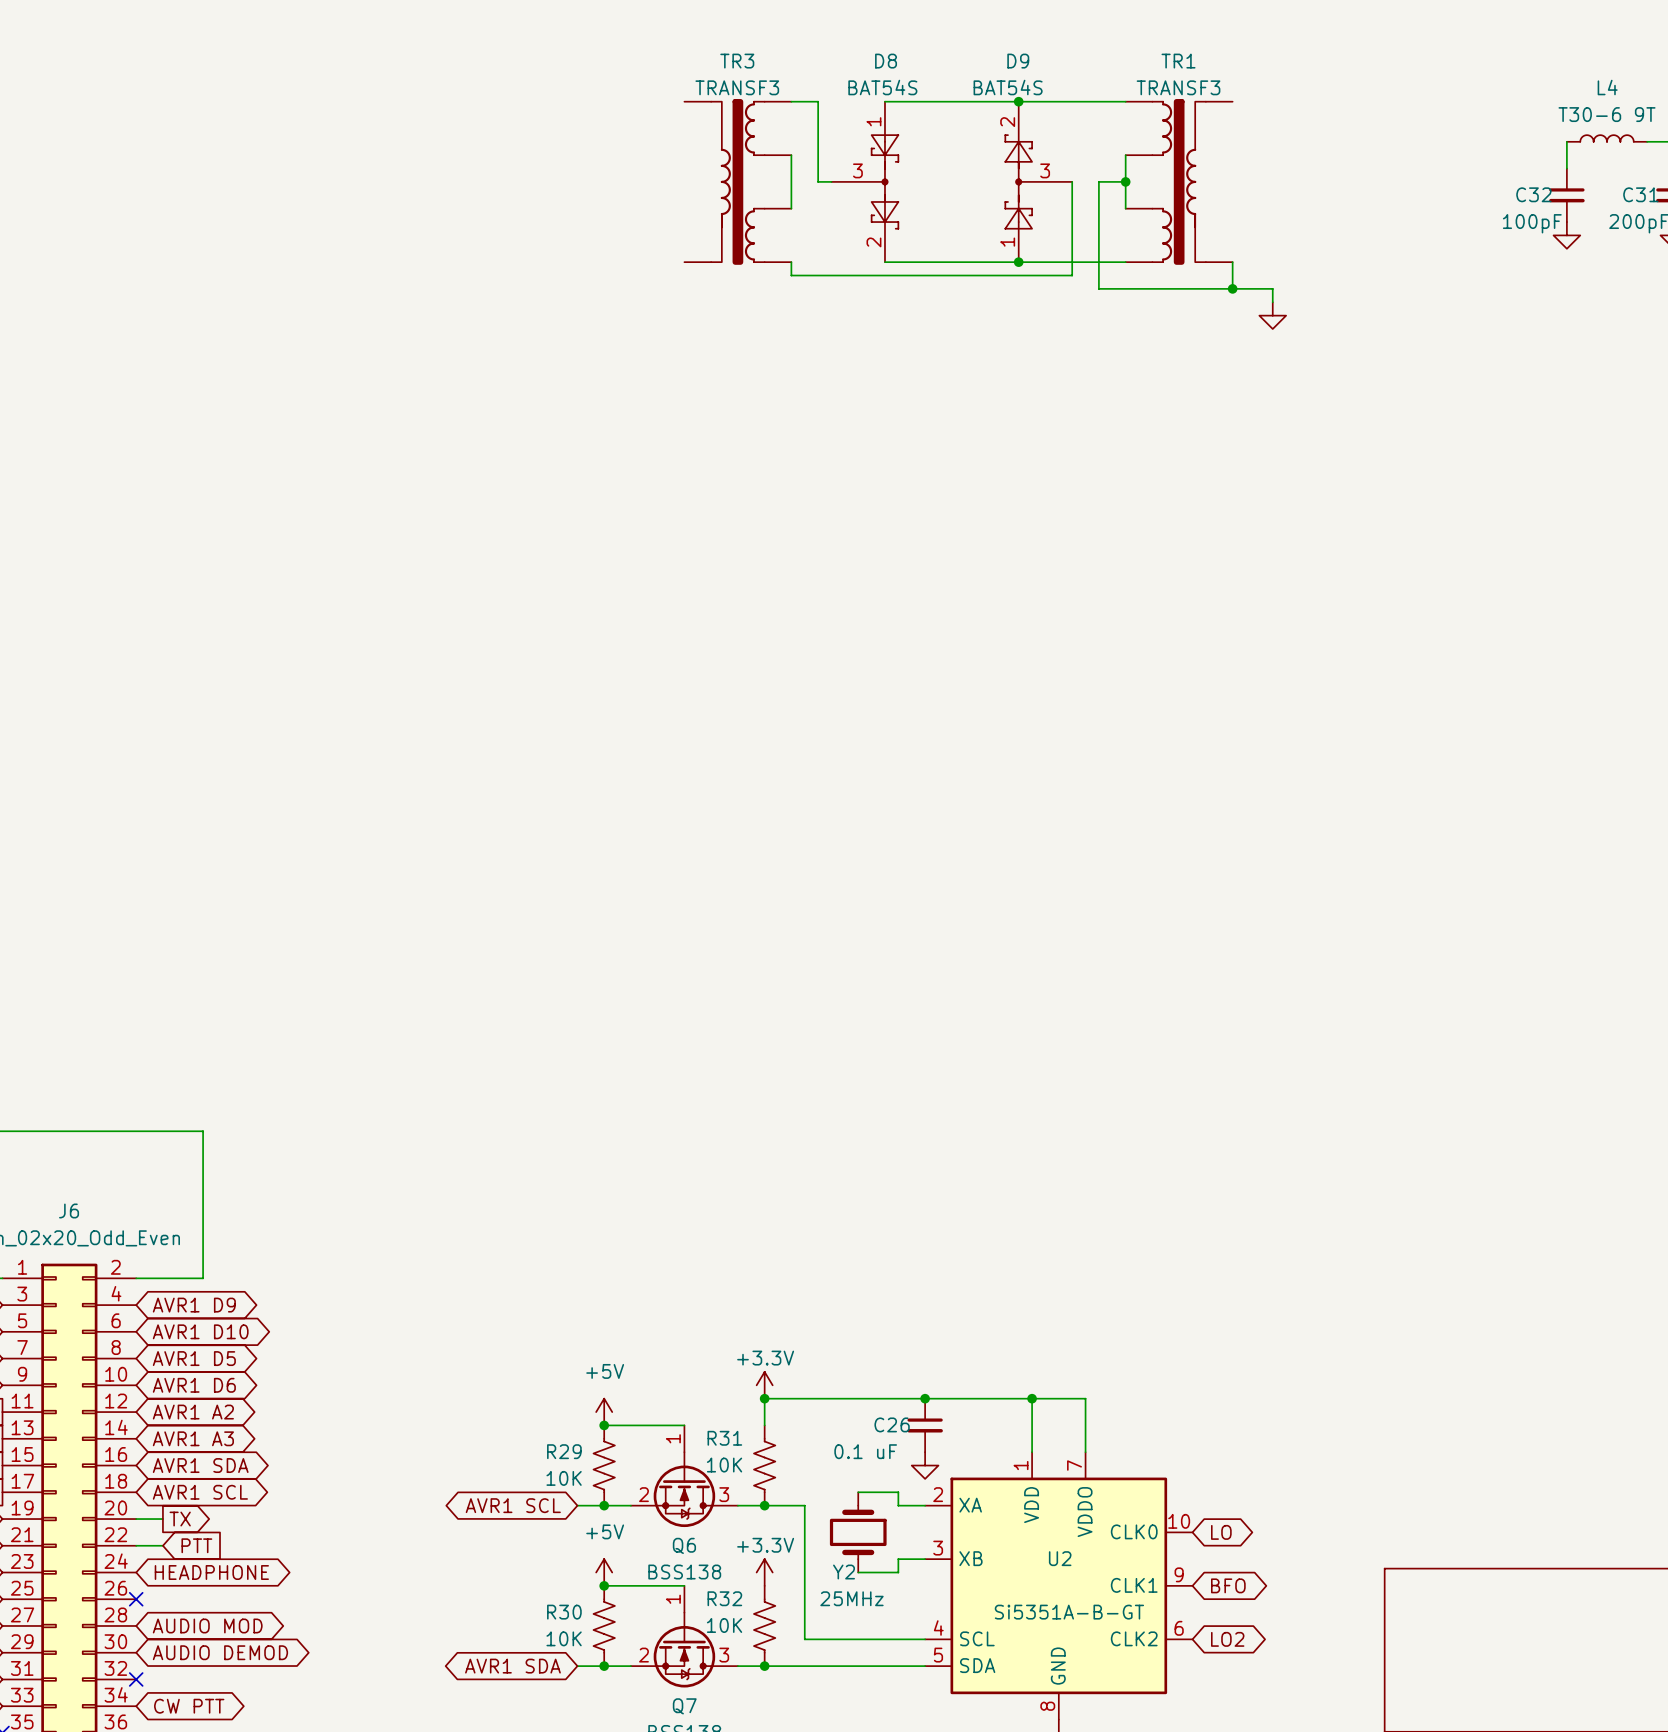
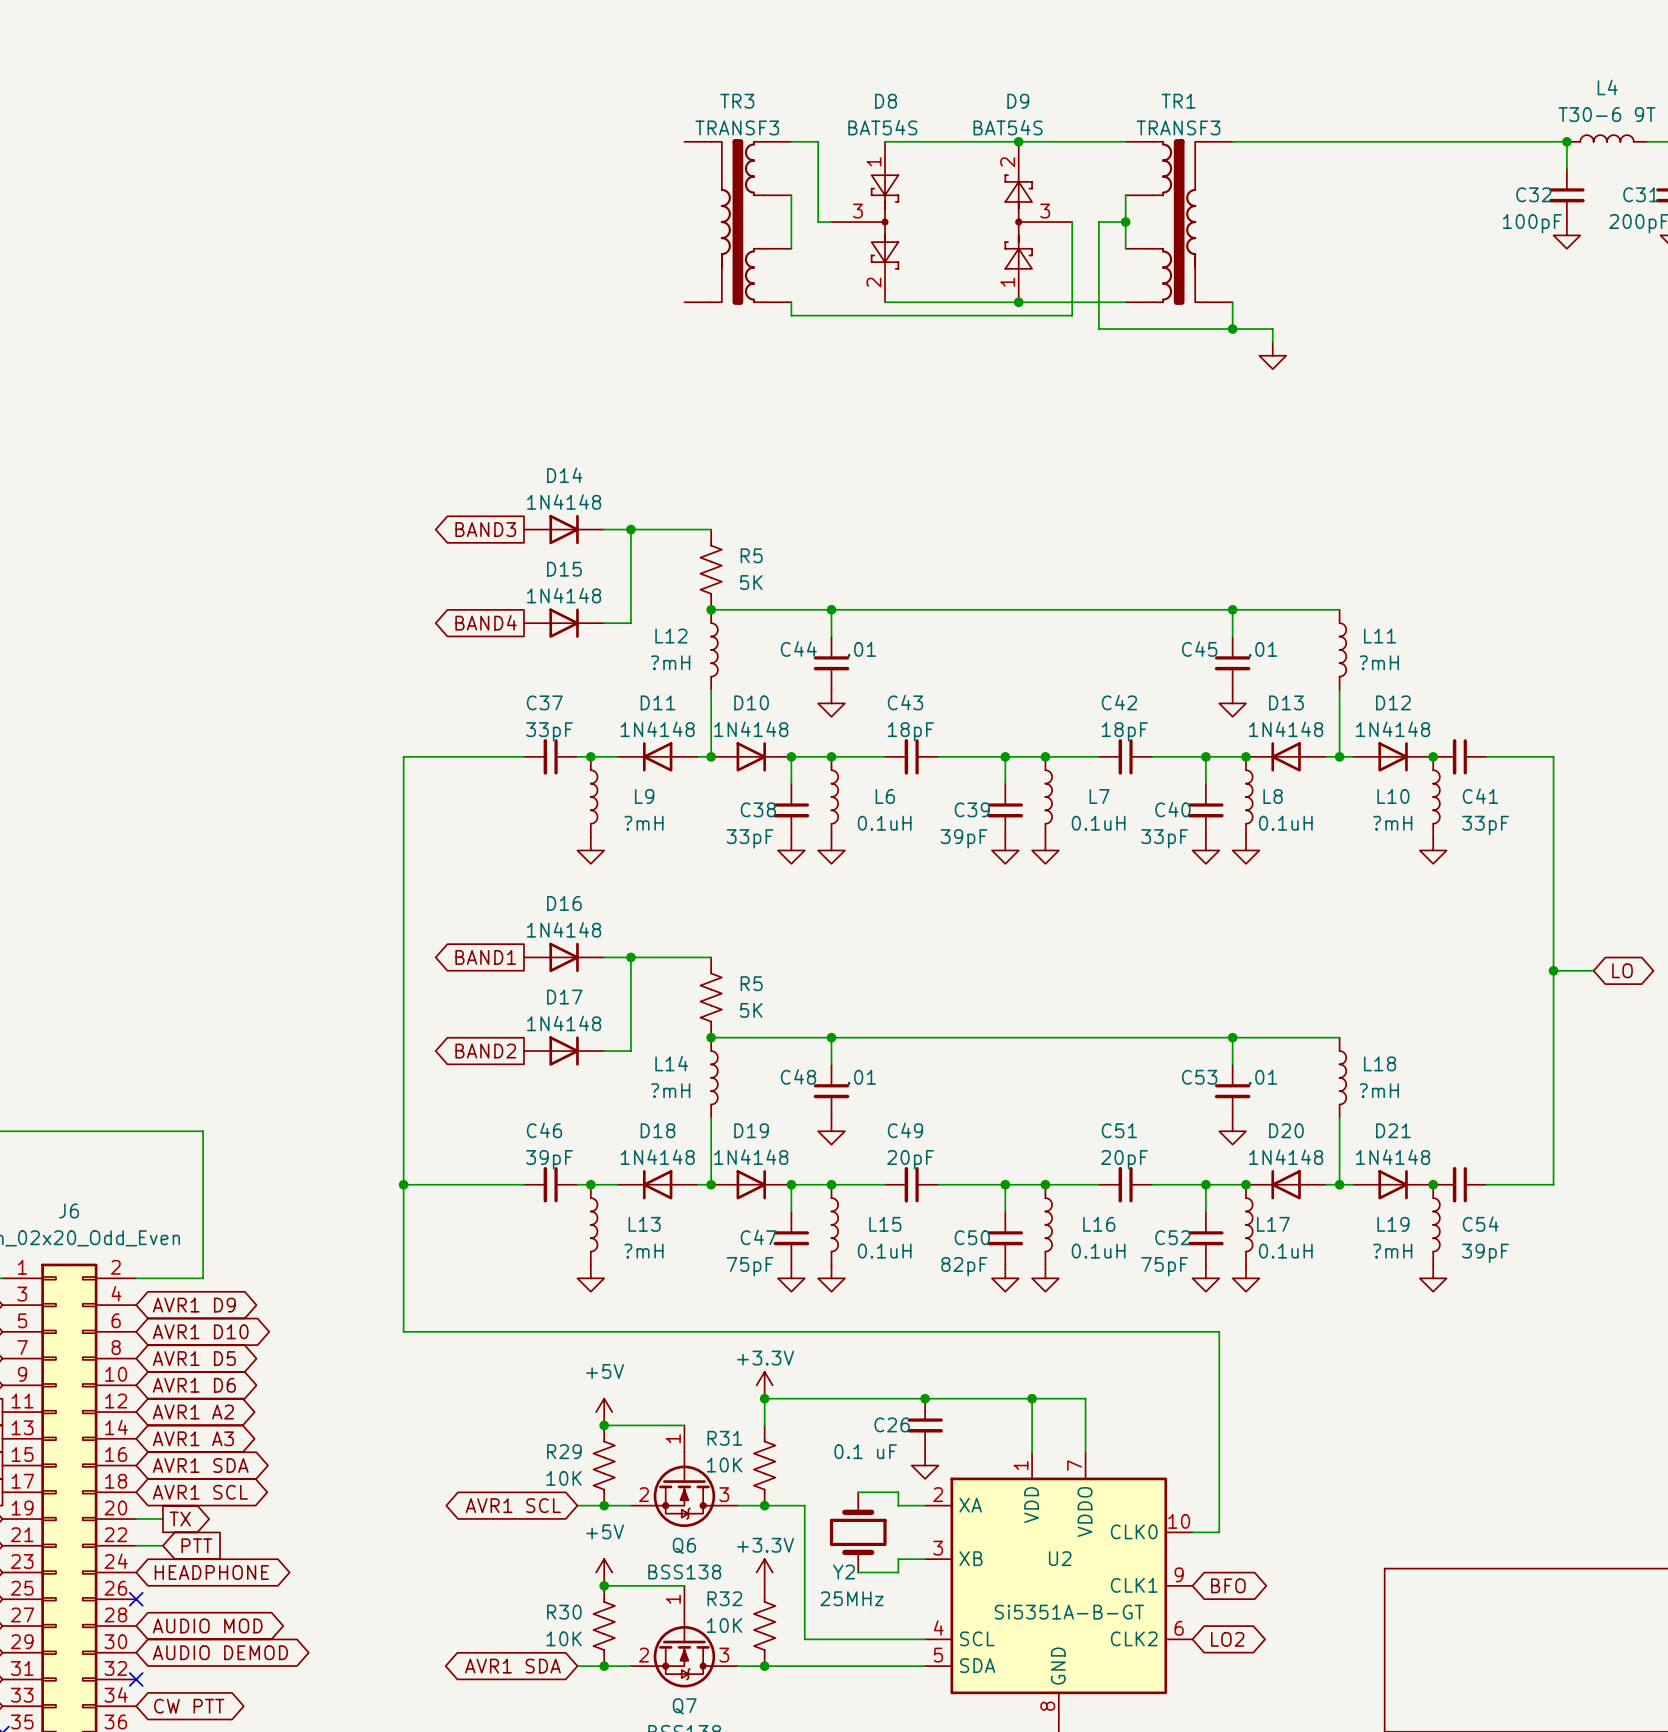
wire: (791, 101) (818, 101) (818, 141) -> (791, 141) (818, 141)
wire: (884, 101) (1125, 101) -> (884, 141) (1125, 141)
junction position: (1018, 101) -> (1018, 141)
wire: none -> (1232, 141) (1566, 141)
junction: none -> (1566, 141)
wire: (791, 155) (791, 195) -> (791, 208) (791, 248)
wire: (1125, 155) (1125, 195) -> (1125, 208) (1125, 248)
TR3 position: (737, 181) -> (737, 222)
wire: (818, 181) (831, 181) -> (818, 181) (818, 222) (831, 222)
D8 position: (864, 181) -> (864, 222)
D9 position: (1038, 181) -> (1038, 222)
wire: (1072, 181) (1072, 222) -> none
wire: (1125, 181) (1098, 181) (1098, 222) -> (1125, 222) (1098, 222)
junction position: (1125, 181) -> (1125, 222)
TR1 position: (1179, 181) -> (1179, 222)
wire: (791, 262) (791, 275) (1072, 275) -> (791, 302) (791, 315) (1072, 315) (1072, 275)
wire: (884, 262) (1125, 262) -> (884, 302) (1125, 302)
junction position: (1018, 262) -> (1018, 302)
wire: (1232, 262) (1232, 288) -> (1232, 302) (1232, 329)
wire: (1098, 288) (1272, 288) (1272, 302) -> (1098, 288) (1098, 329) (1272, 329) (1272, 342)
junction position: (1232, 288) -> (1232, 329)
power symbol position: (1272, 315) -> (1272, 355)
global label: none -> BAND3 (485, 529)
D14: none -> 1N4148 (564, 529)
wire: none -> (604, 529) (711, 529)
wire: none -> (630, 529) (630, 623) (604, 623)
junction: none -> (630, 529)
R5: none -> 5K (711, 569)
wire: none -> (711, 609) (1339, 609)
junction: none -> (711, 609)
wire: none -> (831, 609) (831, 636)
junction: none -> (831, 609)
wire: none -> (1232, 609) (1232, 636)
junction: none -> (1232, 609)
global label: none -> BAND4 (486, 622)
D15: none -> 1N4148 (564, 623)
L12: none -> ?mH (714, 649)
L11: none -> ?mH (1342, 649)
C44: none -> .01 (831, 663)
C45: none -> .01 (1232, 663)
wire: none -> (711, 690) (711, 756) (697, 756)
wire: none -> (1339, 690) (1339, 756)
power symbol: none -> (831, 703)
power symbol: none -> (1232, 703)
wire: none -> (523, 756) (403, 756) (403, 1331) (1219, 1331) (1219, 1532) (1192, 1532)
C37: none -> 33pF (550, 756)
wire: none -> (577, 756) (617, 756)
junction: none -> (590, 756)
D11: none -> 1N4148 (657, 756)
junction: none -> (711, 756)
D10: none -> 1N4148 (751, 756)
junction: none -> (791, 756)
junction: none -> (831, 756)
wire: none -> (884, 756) (791, 756) (791, 783)
C43: none -> 18pF (911, 756)
wire: none -> (938, 756) (1098, 756)
wire: none -> (1005, 756) (1005, 783)
junction: none -> (1005, 756)
junction: none -> (1045, 756)
C42: none -> 18pF (1125, 756)
wire: none -> (1152, 756) (1246, 756)
wire: none -> (1205, 756) (1205, 783)
junction: none -> (1205, 756)
junction: none -> (1246, 756)
D13: none -> 1N4148 (1286, 756)
wire: none -> (1326, 756) (1352, 756)
junction: none -> (1339, 756)
D12: none -> 1N4148 (1393, 756)
junction: none -> (1433, 756)
C41: none -> 33pF (1459, 756)
wire: none -> (1486, 756) (1553, 756) (1553, 1184) (1486, 1184)
L9: none -> ?mH (594, 796)
L6: none -> 0.1uH (834, 796)
L7: none -> 0.1uH (1048, 796)
L8: none -> 0.1uH (1249, 796)
L10: none -> ?mH (1436, 796)
C38: none -> 33pF (791, 810)
C39: none -> 39pF (1005, 810)
C40: none -> 33pF (1205, 810)
power symbol: none -> (590, 850)
power symbol: none -> (791, 850)
power symbol: none -> (831, 850)
power symbol: none -> (1005, 850)
power symbol: none -> (1045, 850)
power symbol: none -> (1205, 850)
power symbol: none -> (1246, 850)
power symbol: none -> (1433, 850)
global label: none -> BAND1 (485, 957)
D16: none -> 1N4148 (564, 957)
wire: none -> (604, 957) (711, 957)
wire: none -> (630, 957) (630, 1051) (604, 1051)
junction: none -> (630, 957)
wire: none -> (1553, 970) (1593, 970)
junction: none -> (1553, 970)
global label: none -> LO (1622, 970)
R5: none -> 5K (711, 997)
wire: none -> (711, 1037) (1339, 1037)
junction: none -> (711, 1037)
wire: none -> (831, 1037) (831, 1064)
junction: none -> (831, 1037)
wire: none -> (1232, 1037) (1232, 1064)
junction: none -> (1232, 1037)
global label: none -> BAND2 (485, 1051)
D17: none -> 1N4148 (564, 1051)
L14: none -> ?mH (714, 1077)
L18: none -> ?mH (1342, 1077)
C48: none -> .01 (831, 1091)
C53: none -> .01 (1232, 1091)
wire: none -> (711, 1117) (711, 1184) (697, 1184)
wire: none -> (1339, 1117) (1339, 1184)
power symbol: none -> (831, 1131)
power symbol: none -> (1232, 1131)
wire: none -> (403, 1184) (523, 1184)
junction: none -> (403, 1184)
C46: none -> 39pF (550, 1184)
wire: none -> (577, 1184) (617, 1184)
junction: none -> (590, 1184)
D18: none -> 1N4148 (657, 1184)
junction: none -> (711, 1184)
D19: none -> 1N4148 (751, 1184)
junction: none -> (791, 1184)
junction: none -> (831, 1184)
wire: none -> (884, 1184) (791, 1184) (791, 1211)
C49: none -> 20pF (911, 1184)
wire: none -> (938, 1184) (1098, 1184)
wire: none -> (1005, 1184) (1005, 1211)
junction: none -> (1005, 1184)
junction: none -> (1045, 1184)
C51: none -> 20pF (1125, 1184)
wire: none -> (1152, 1184) (1246, 1184)
wire: none -> (1205, 1184) (1205, 1211)
junction: none -> (1205, 1184)
junction: none -> (1246, 1184)
D20: none -> 1N4148 (1286, 1184)
wire: none -> (1326, 1184) (1352, 1184)
junction: none -> (1339, 1184)
D21: none -> 1N4148 (1393, 1184)
junction: none -> (1433, 1184)
C54: none -> 39pF (1459, 1184)
L13: none -> ?mH (594, 1224)
L15: none -> 0.1uH (834, 1224)
L16: none -> 0.1uH (1048, 1224)
L17: none -> 0.1uH (1249, 1224)
L19: none -> ?mH (1436, 1224)
C47: none -> 75pF (791, 1238)
C50: none -> 82pF (1005, 1238)
C52: none -> 75pF (1205, 1238)
power symbol: none -> (590, 1278)
power symbol: none -> (791, 1278)
power symbol: none -> (831, 1278)
power symbol: none -> (1005, 1278)
power symbol: none -> (1045, 1278)
power symbol: none -> (1205, 1278)
power symbol: none -> (1246, 1278)
power symbol: none -> (1433, 1278)
global label: LO (1221, 1532) -> none

